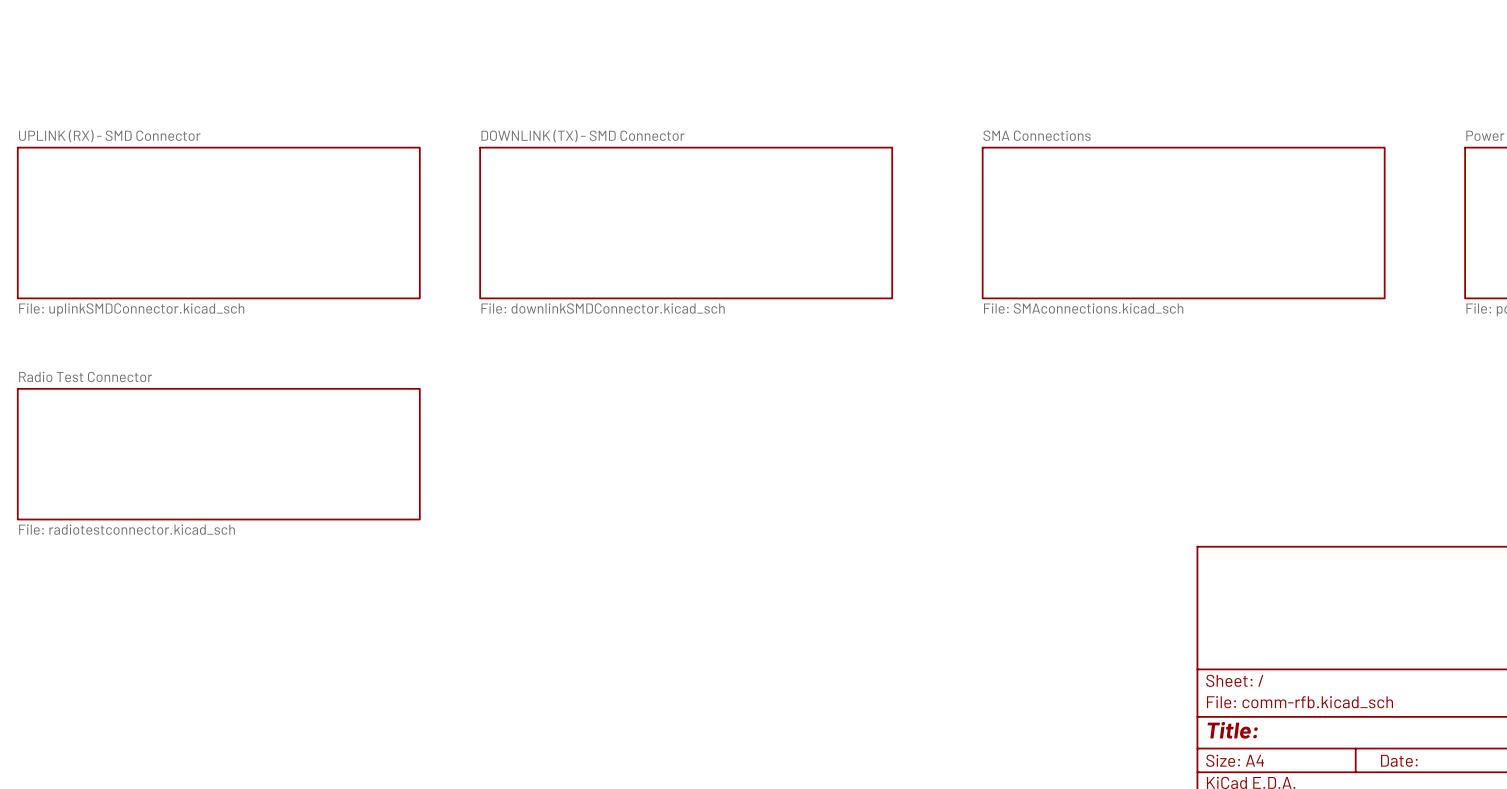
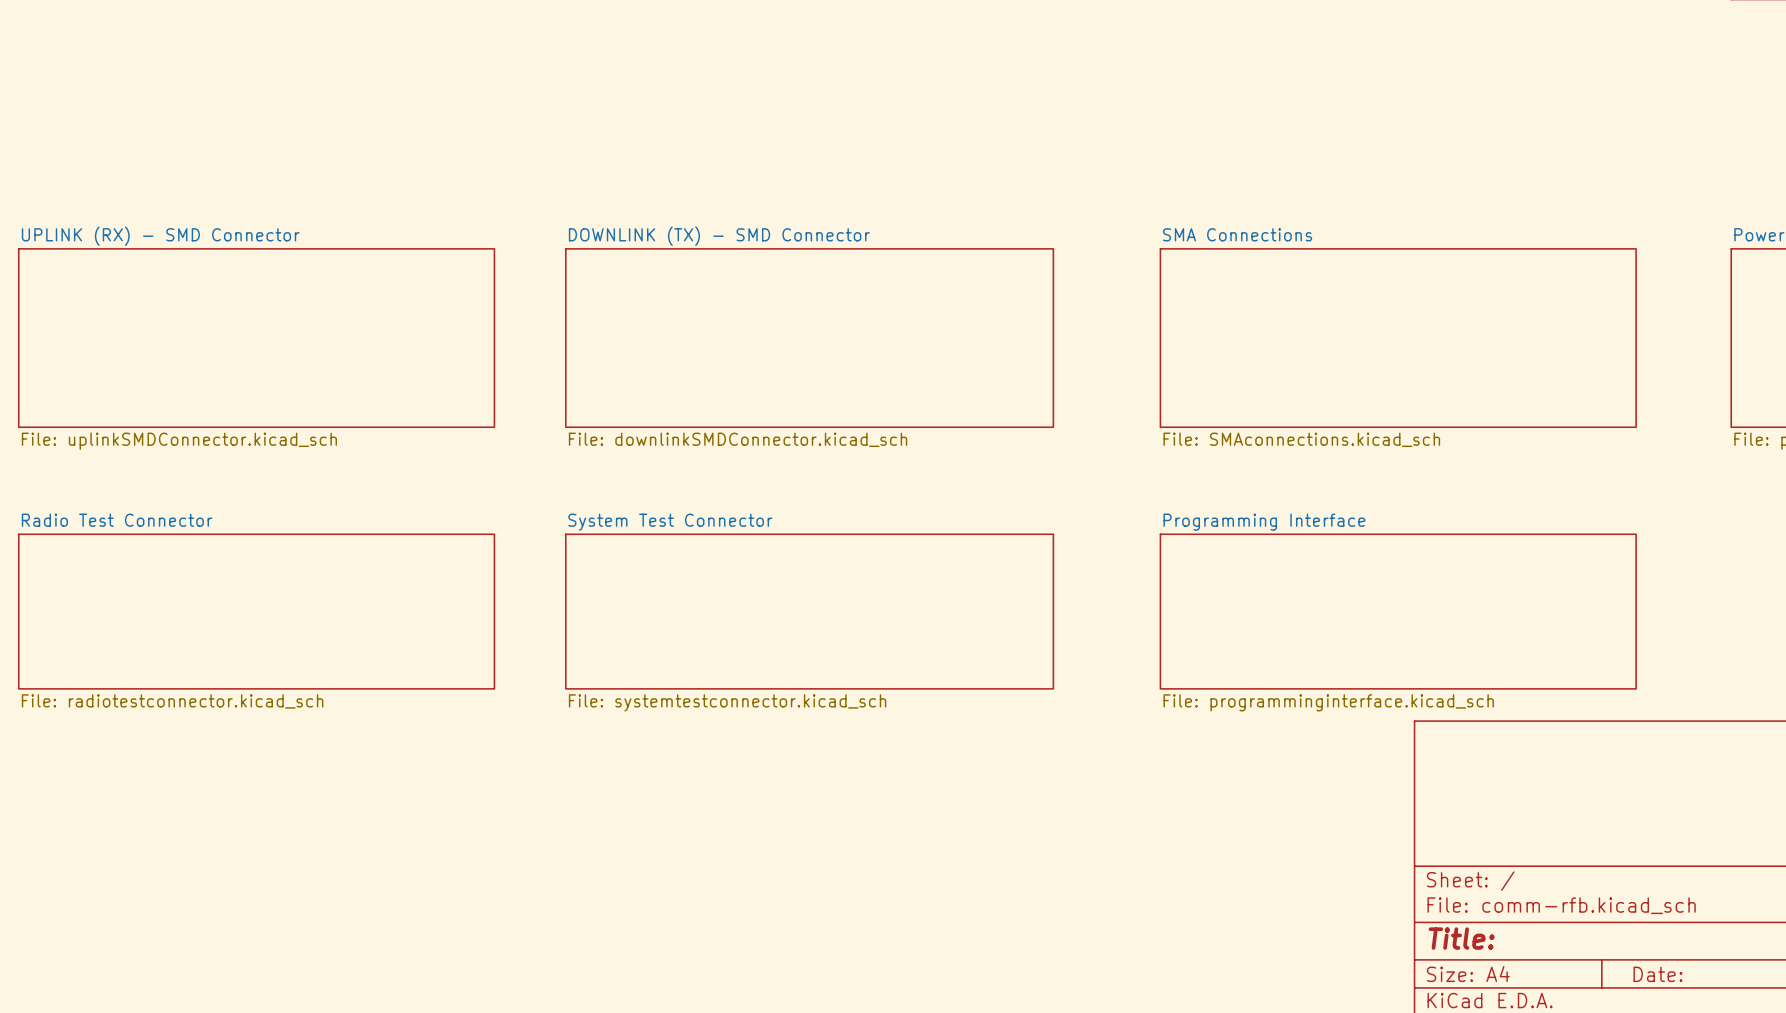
sheet System Test Connector: none -> File: systemtestconnector.kicad_sch (809, 611)
sheet Programming Interface: none -> File: programminginterface.kicad_sch (1398, 611)

